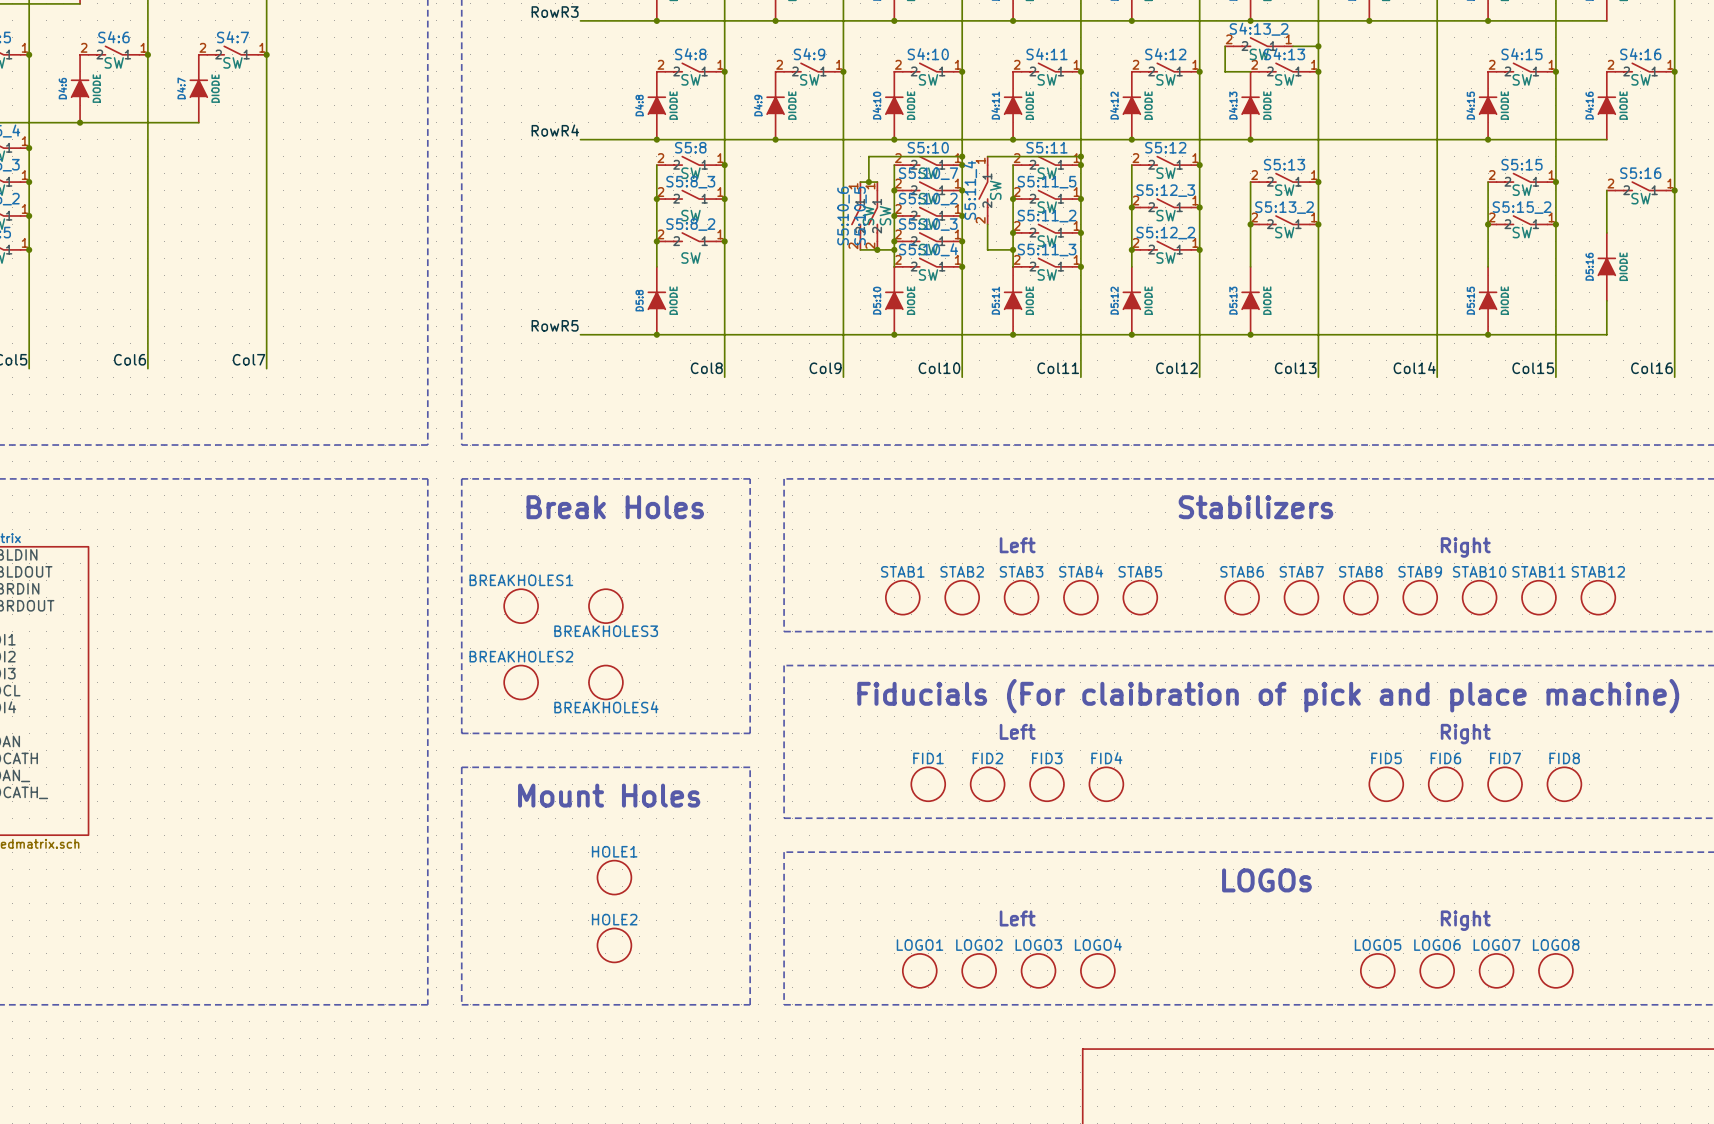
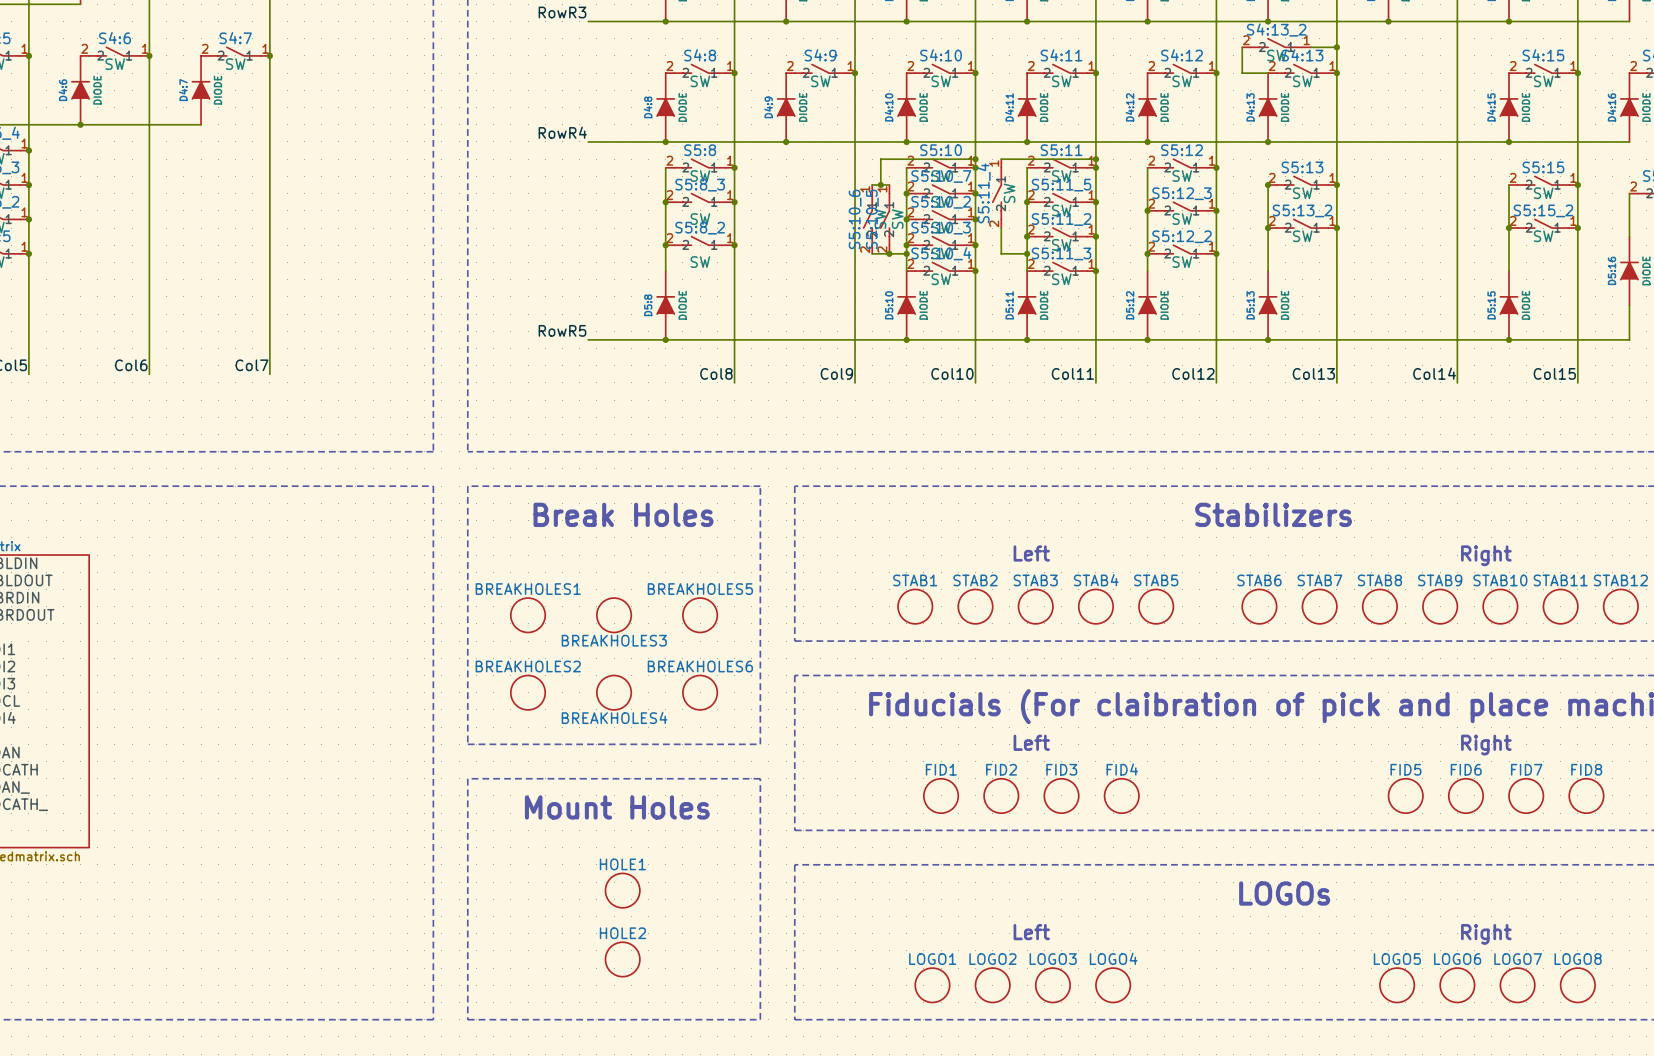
junction: none -> (1268, 185)
BREAKHOLES5: none -> (700, 615)
BREAKHOLES6: none -> (700, 692)

